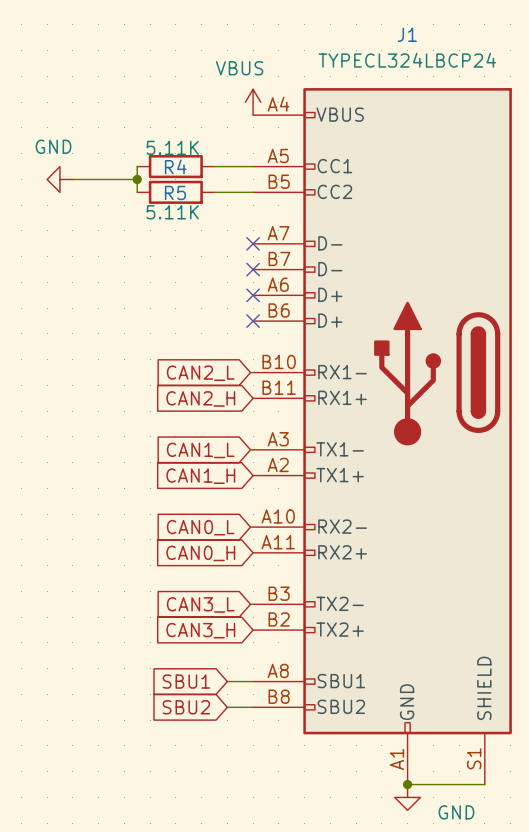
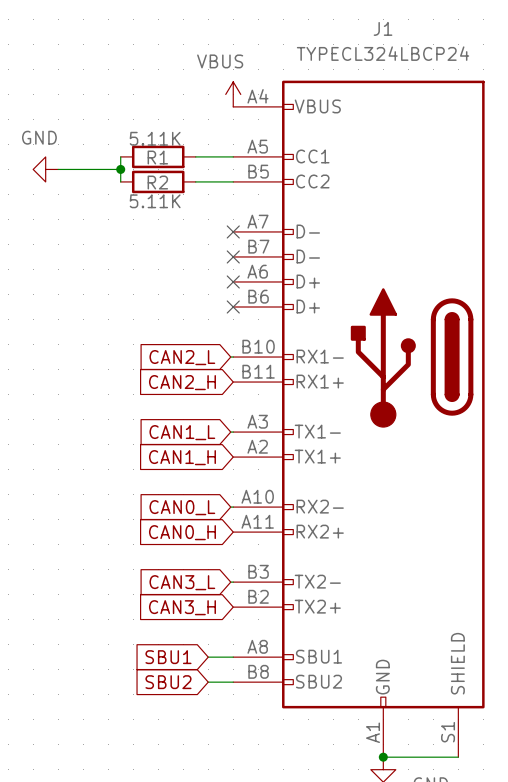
R4 name: R4 (175, 166) -> R1 (157, 157)
R5 name: R5 (175, 192) -> R2 (157, 182)

